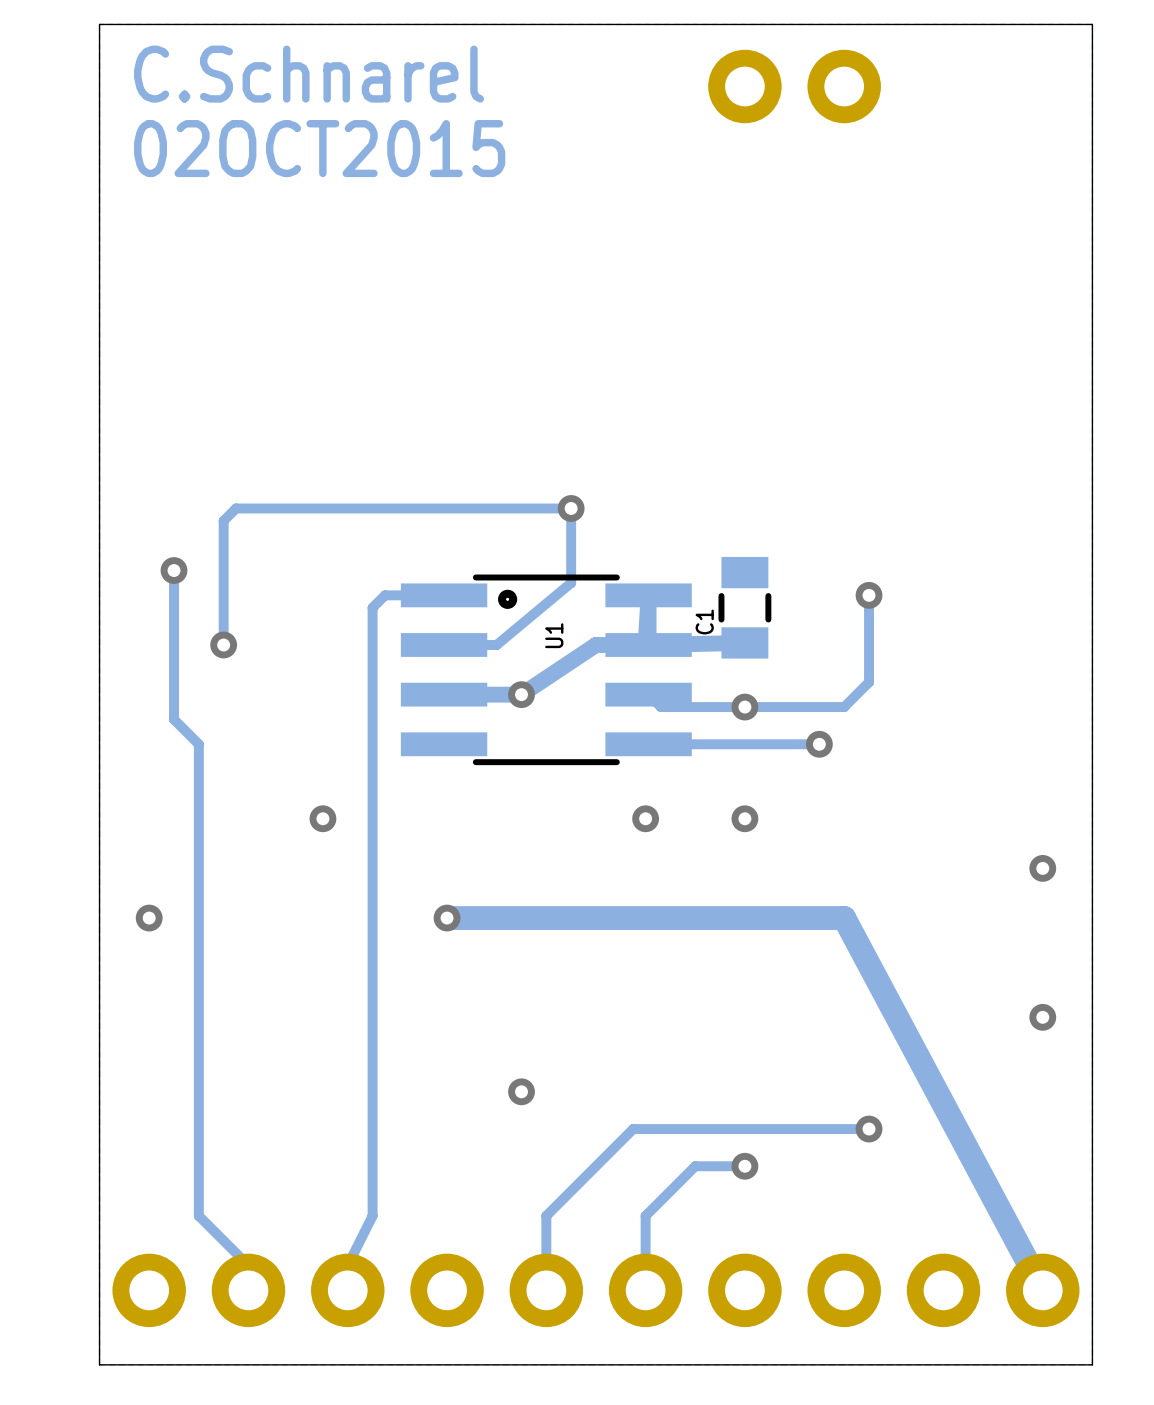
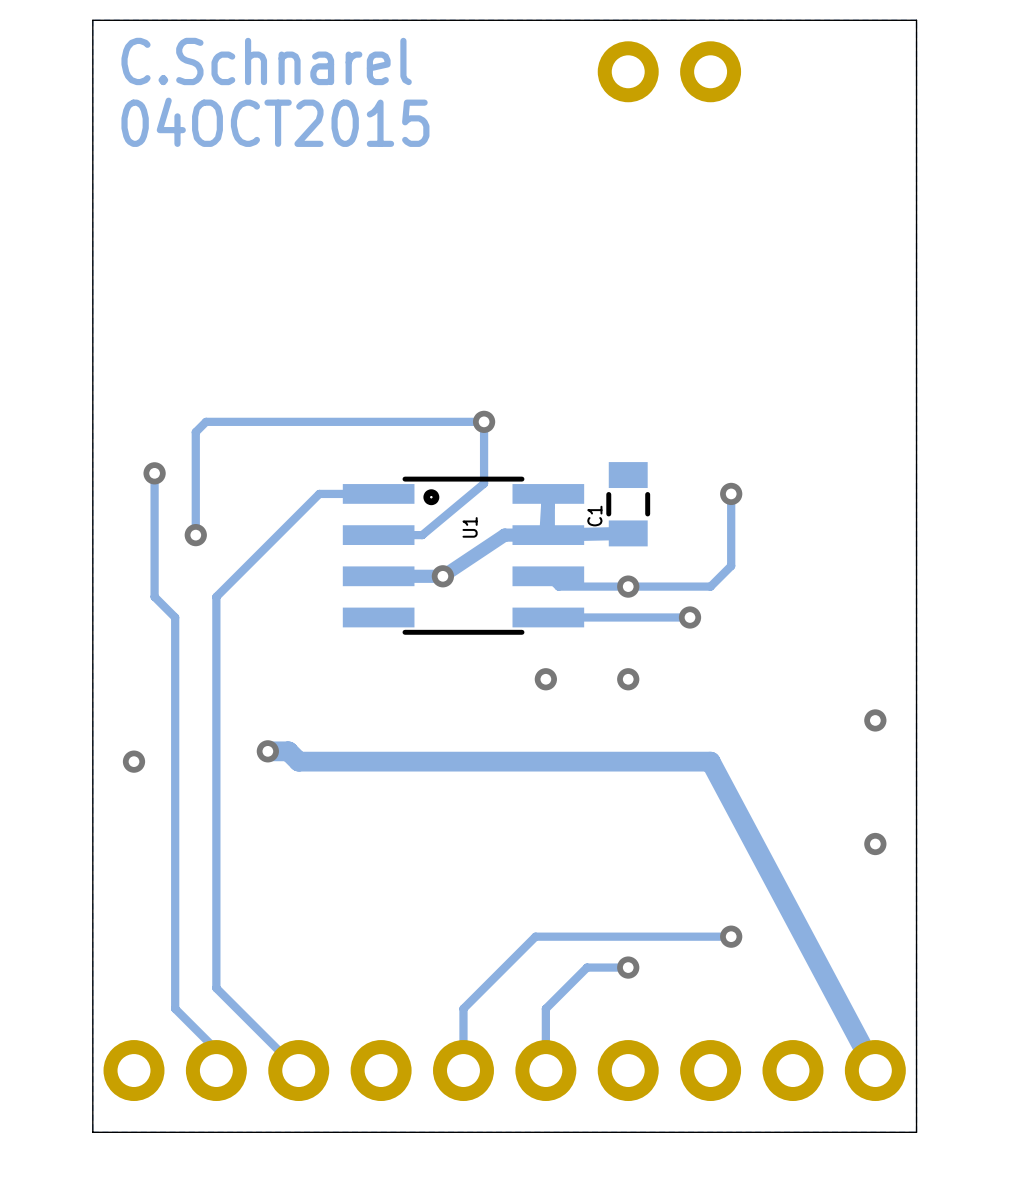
text: 02OCT2015 (319, 148) -> 04OCT2015 (275, 122)
track: (384, 595) (372, 607) (372, 1215) (347, 1265) (347, 1290) -> (329, 493) (319, 493) (216, 596) (216, 988) (298, 1070)
via: (322, 818) -> none
track: none -> (267, 751) (288, 751) (298, 761) (381, 761)
via: none -> (267, 751)
via: (447, 918) -> none
via: (521, 1091) -> none

